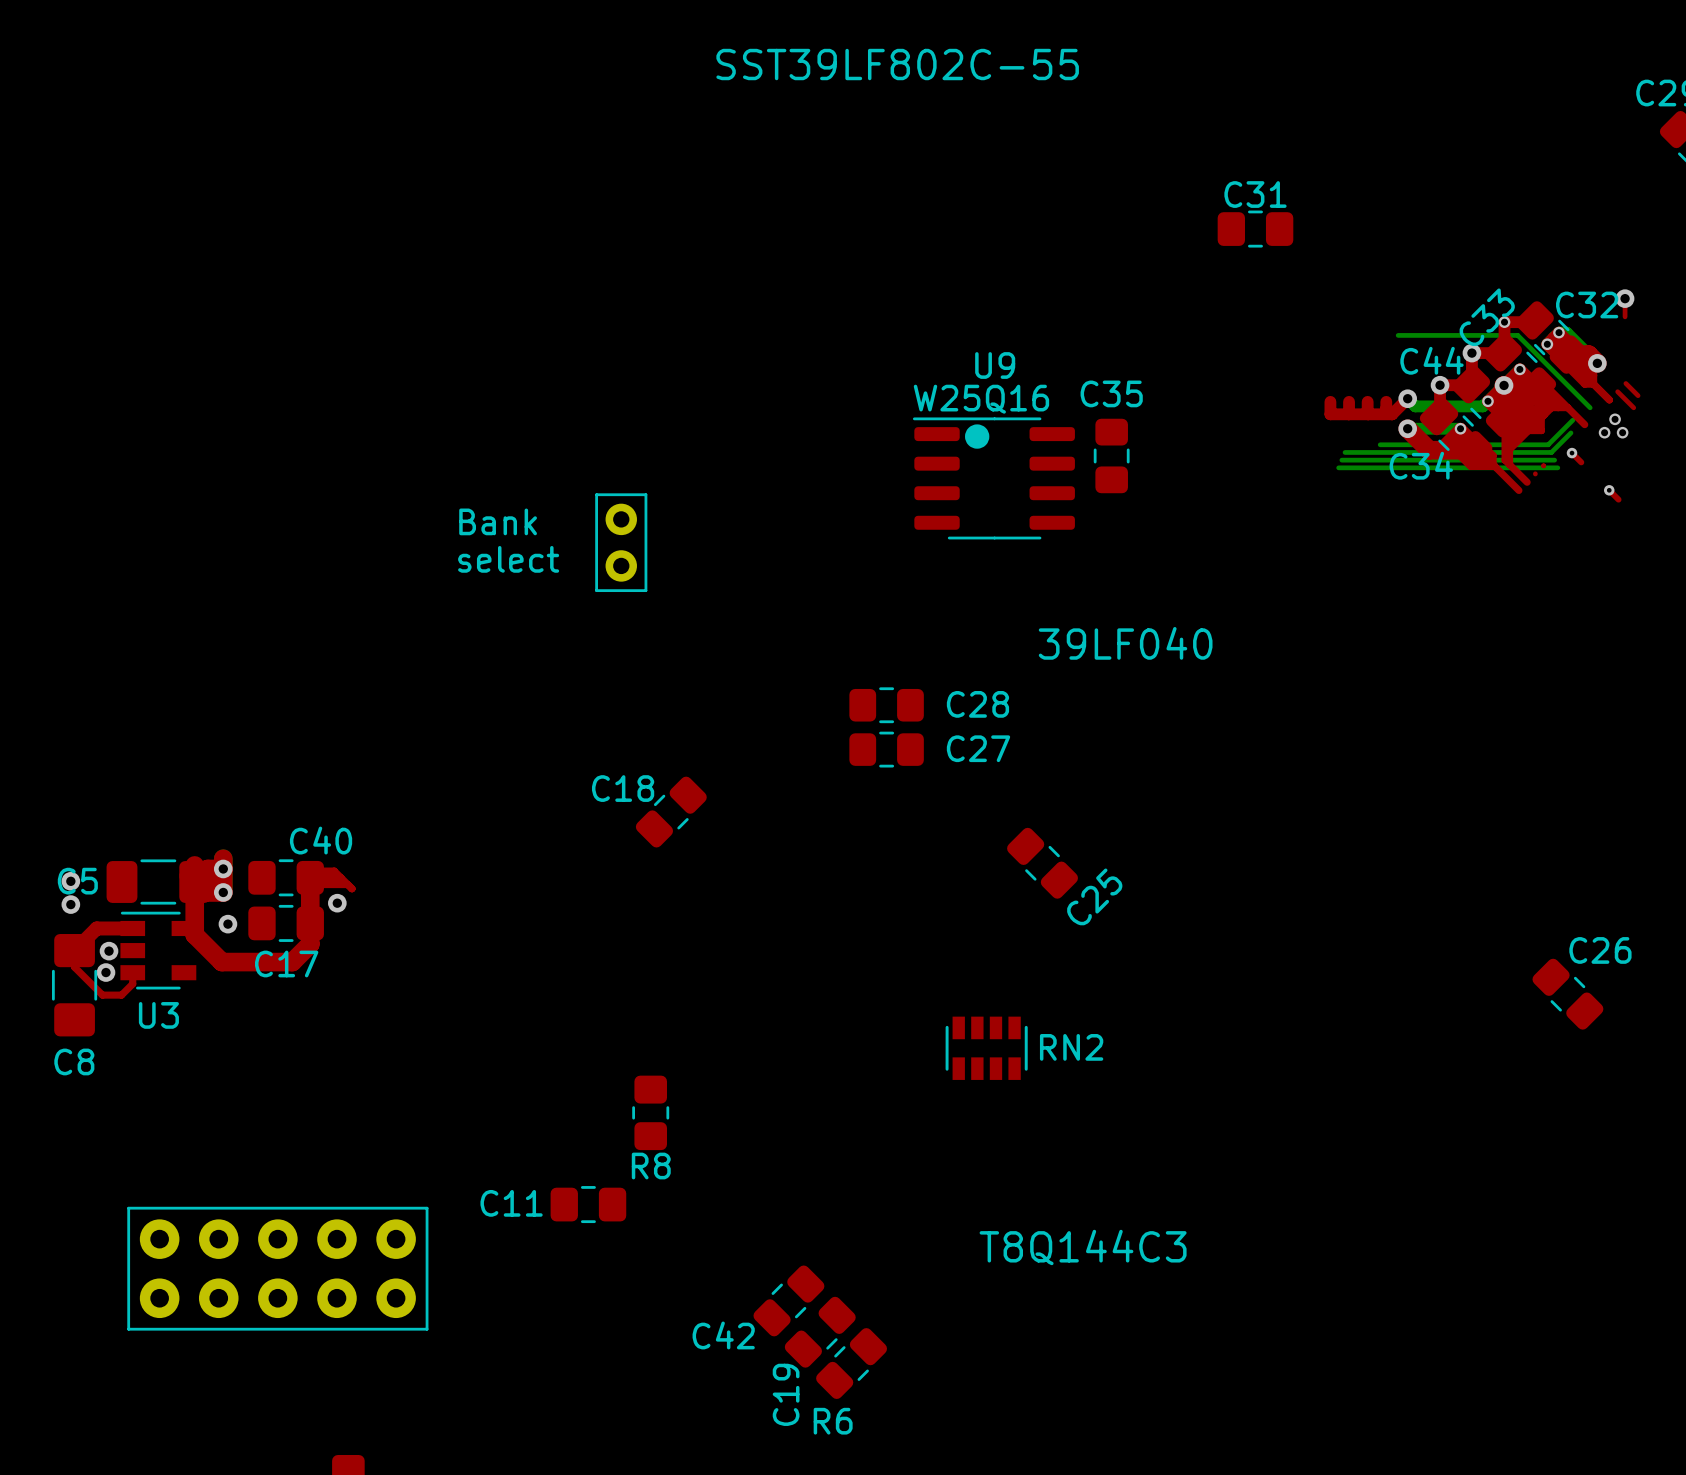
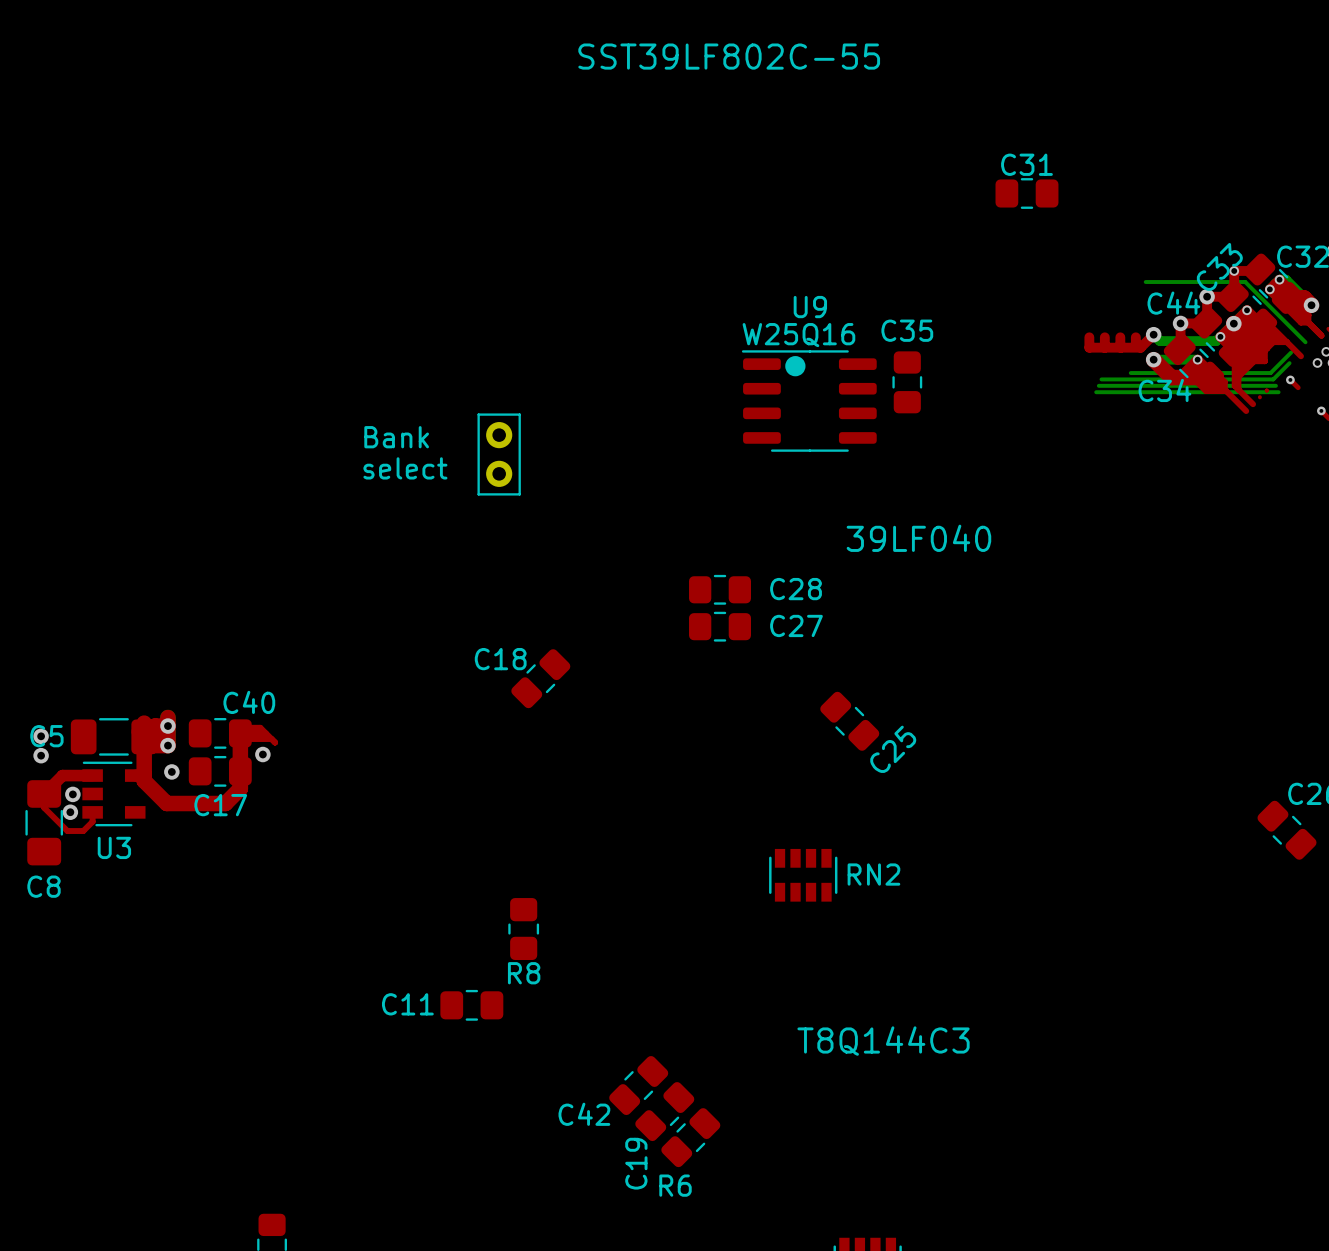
part: (277, 1268) -> none

